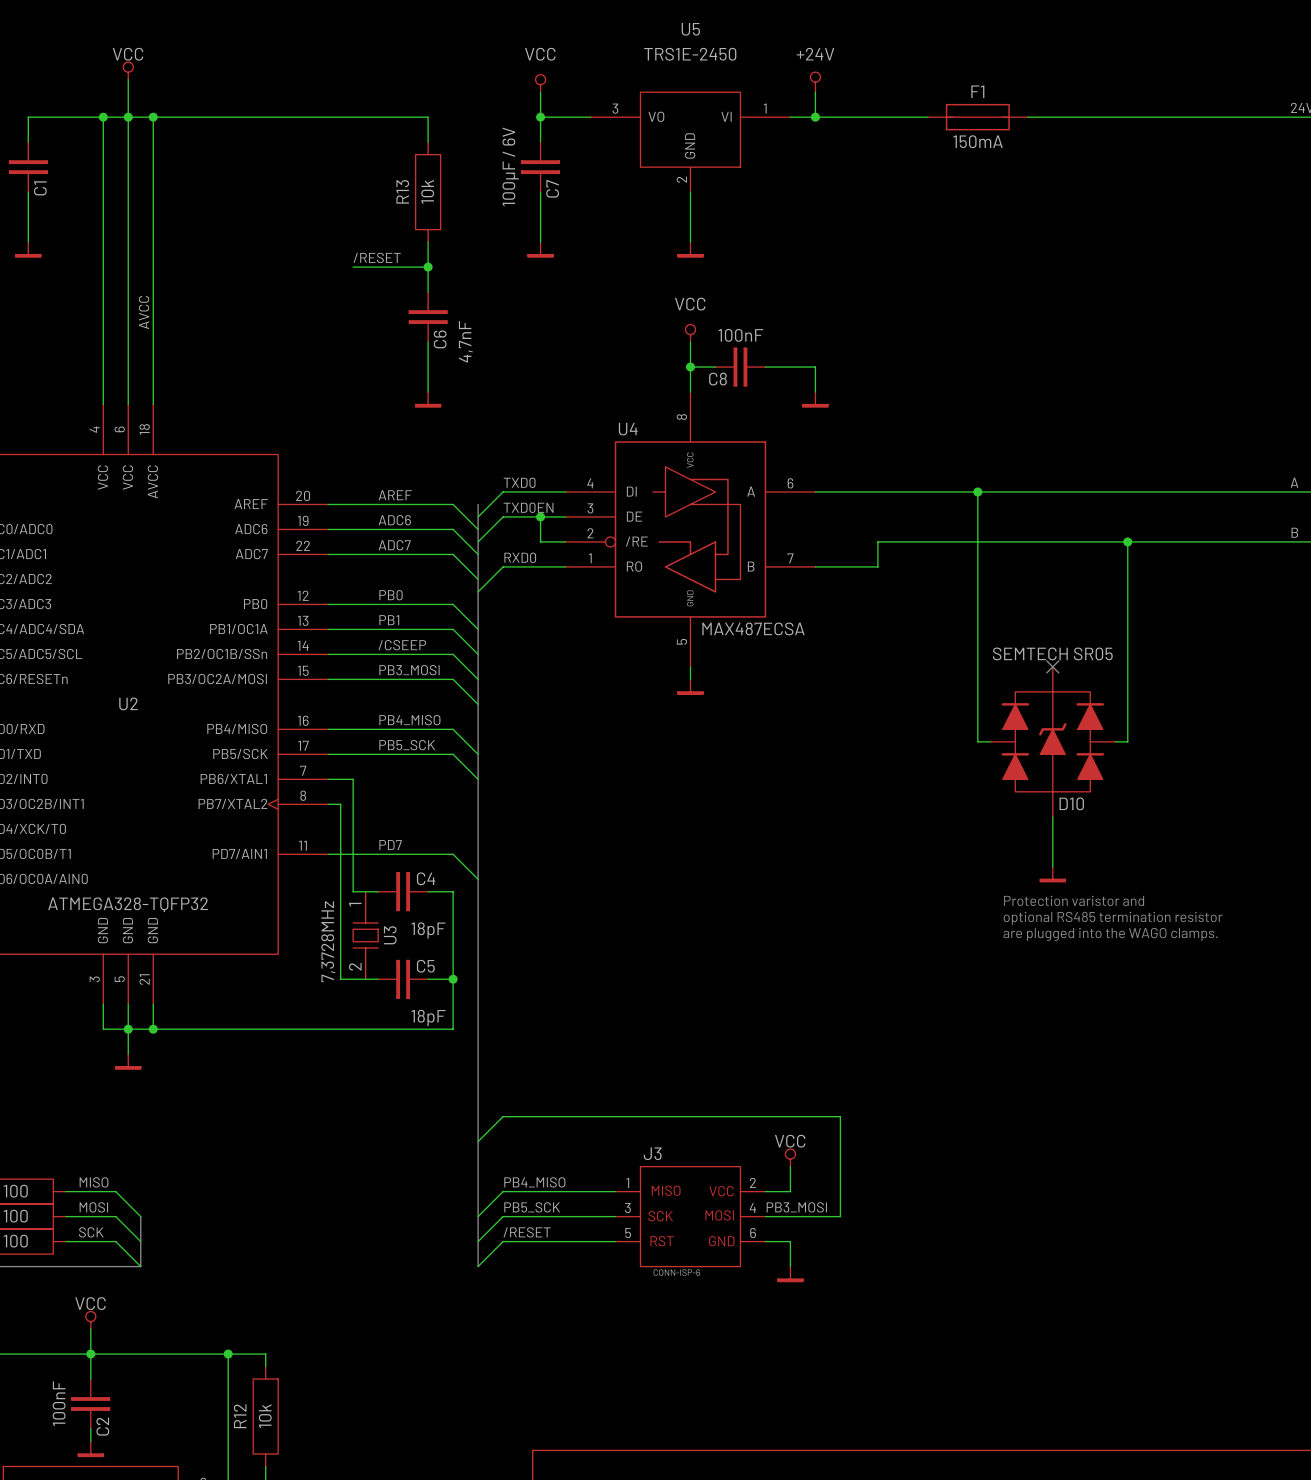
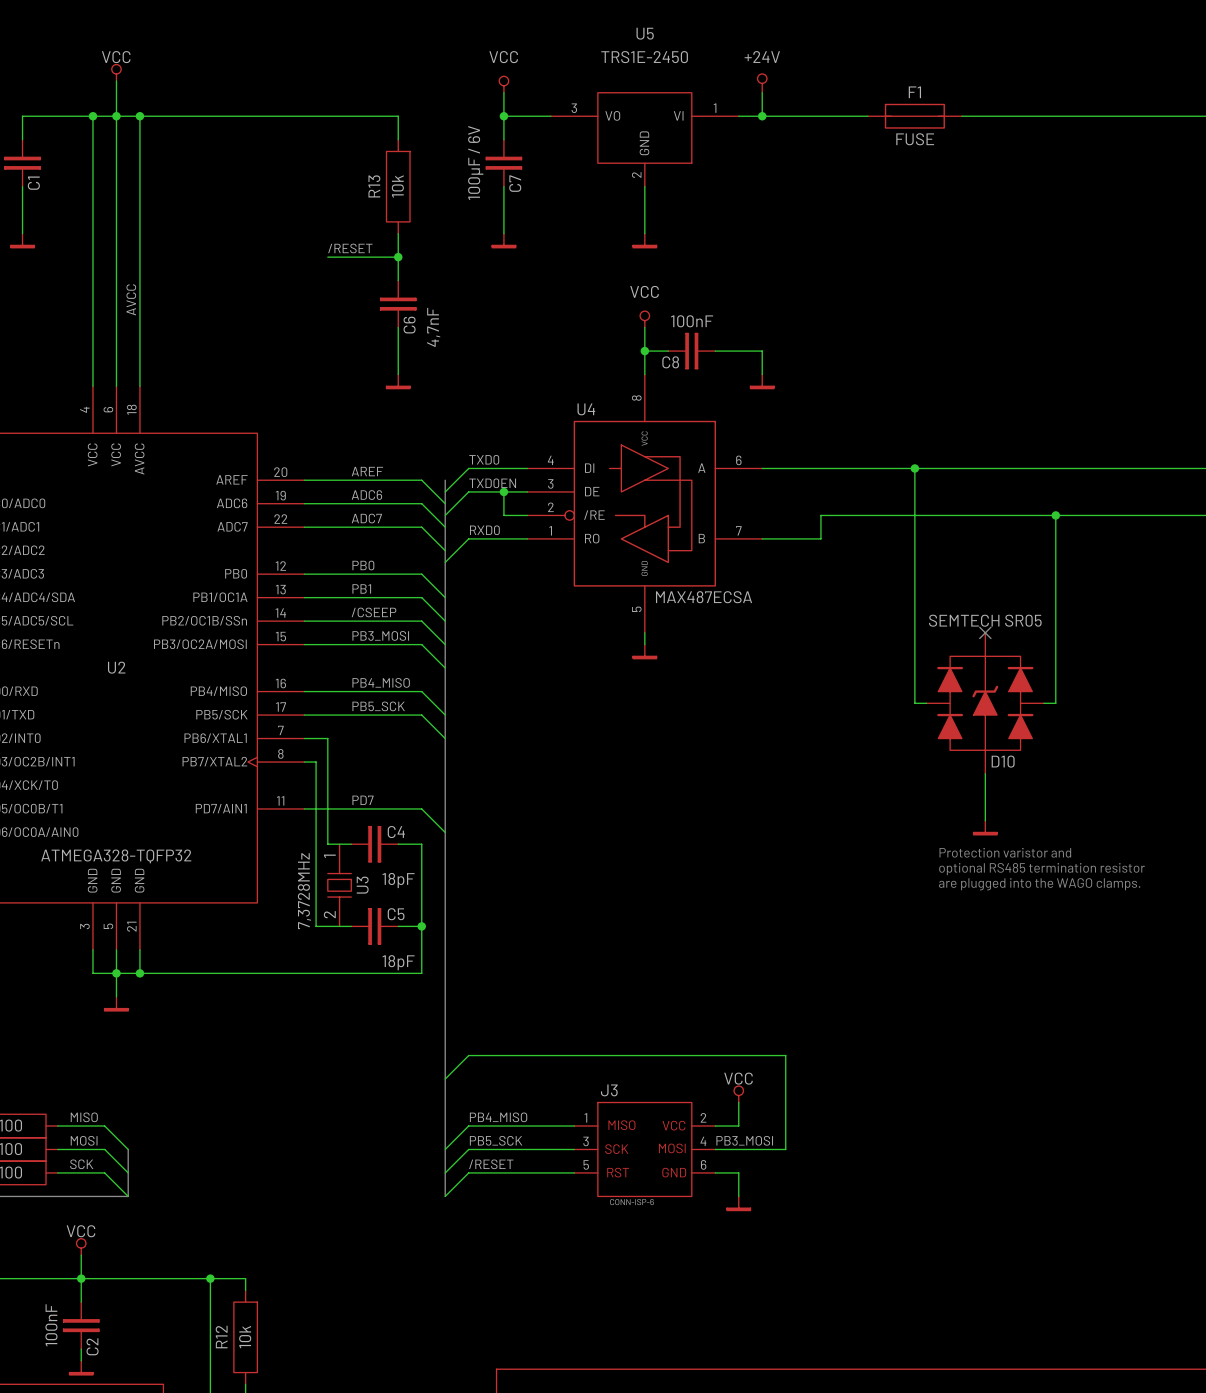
F1 value: 150mA (978, 141) -> FUSE (915, 139)

